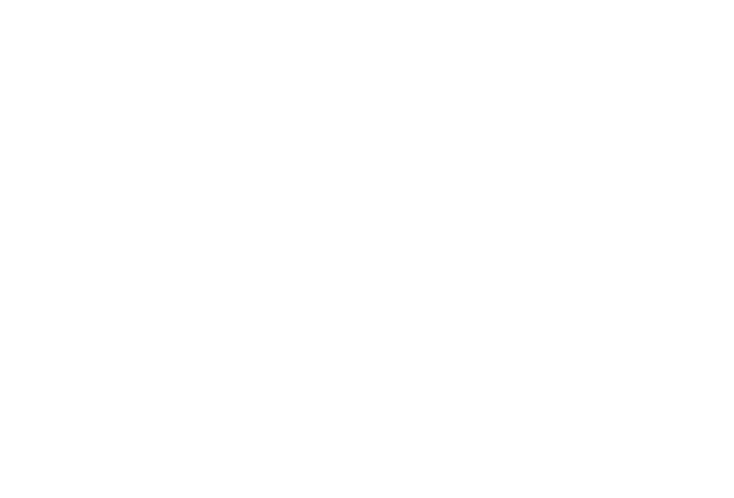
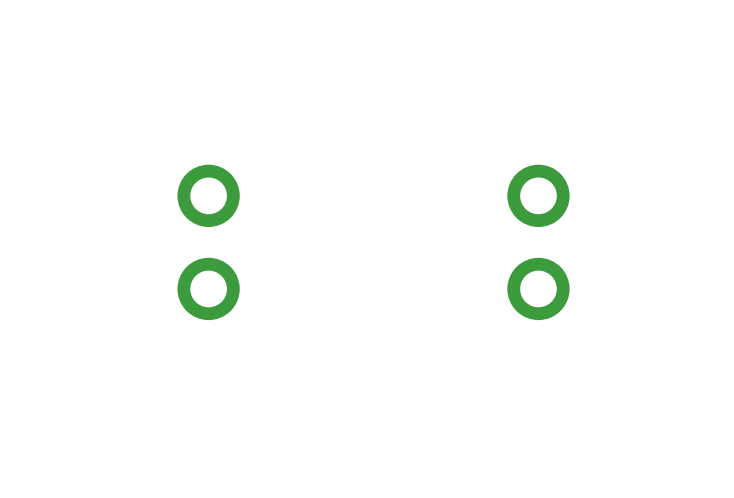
part: none -> (208, 242)
part: none -> (538, 242)

